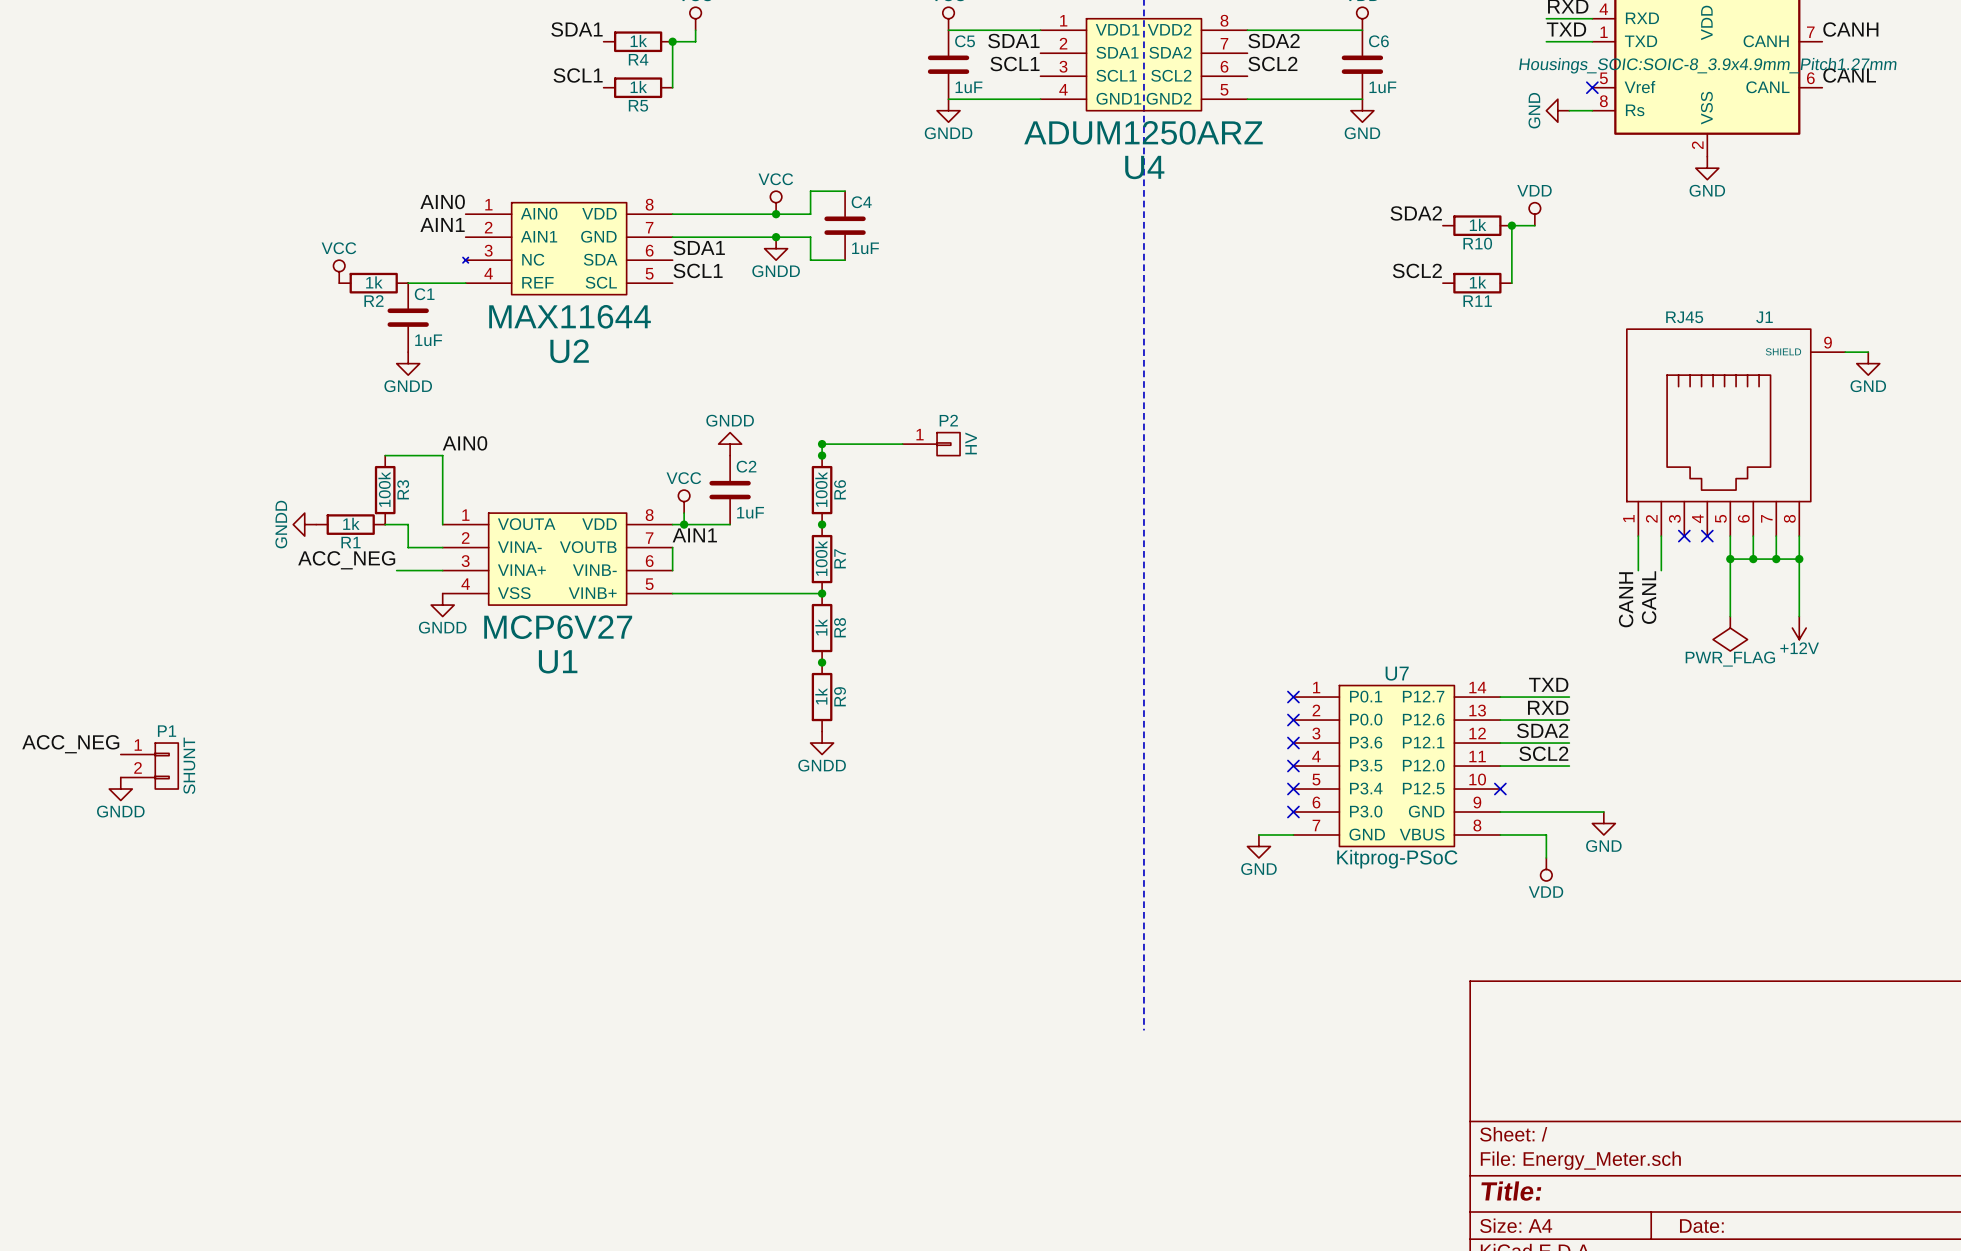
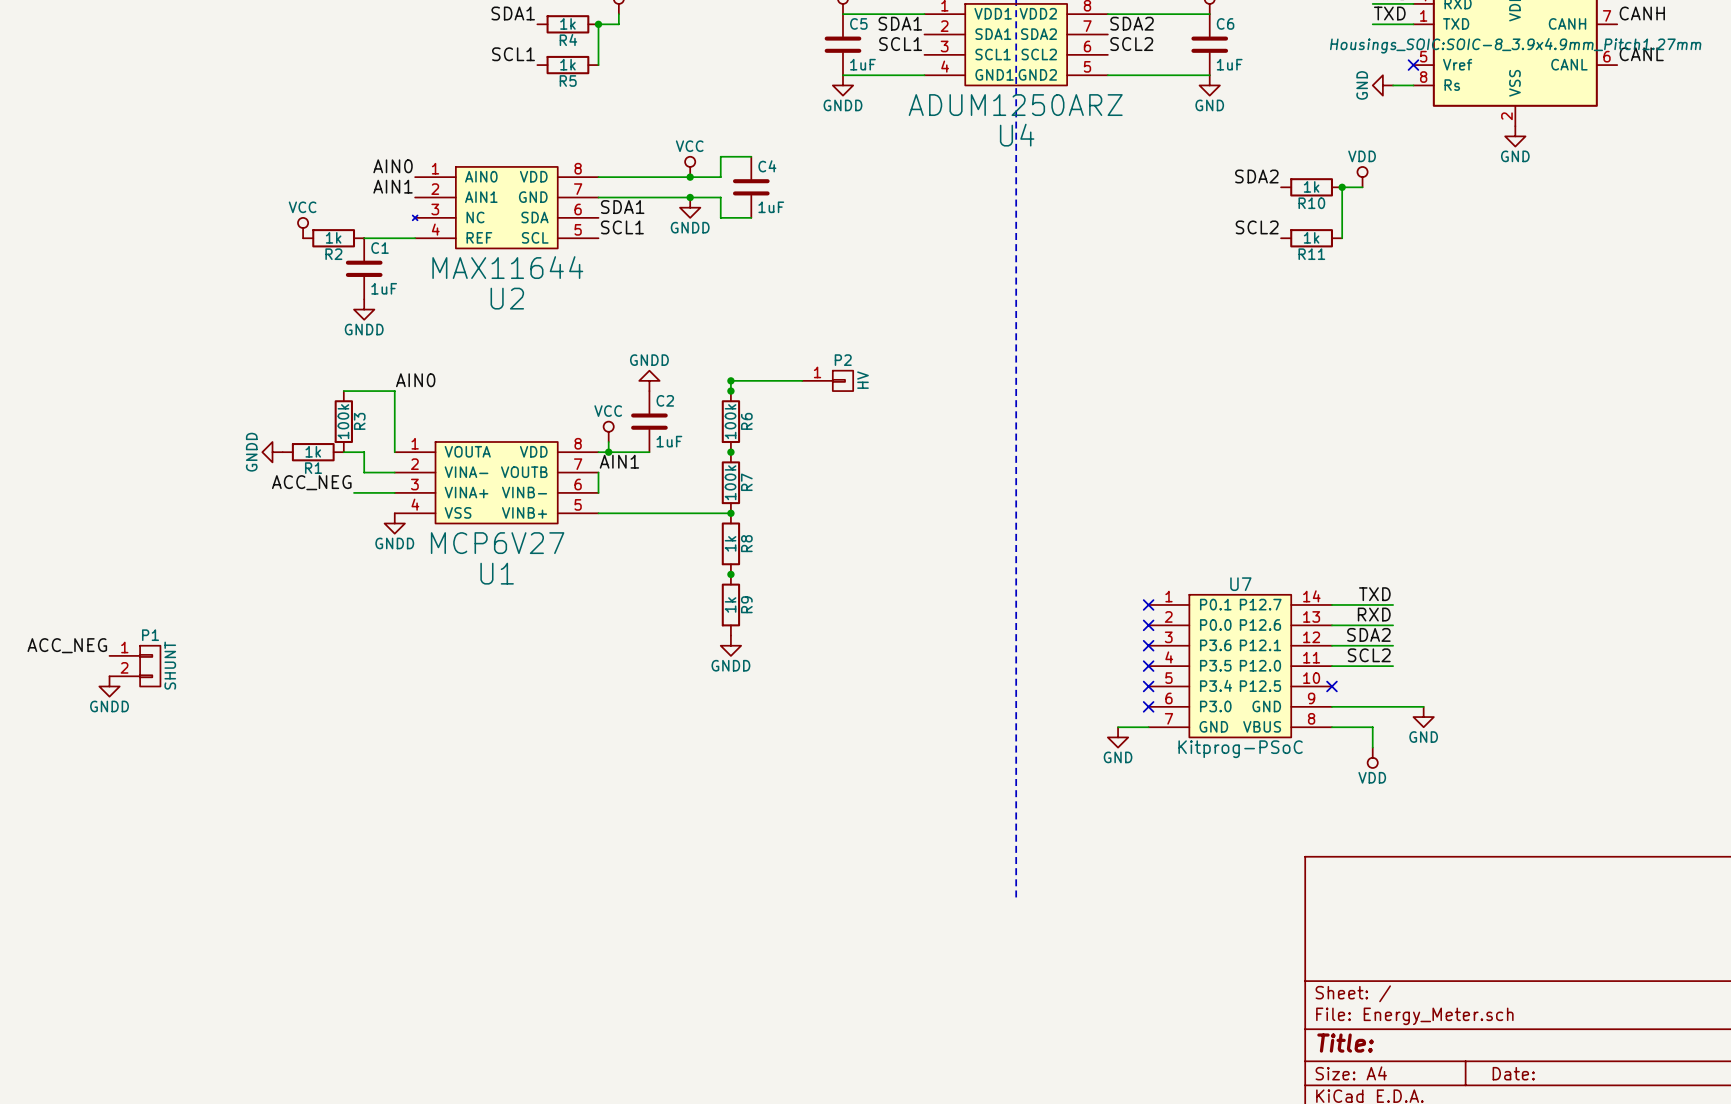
wire: (1845, 352) (1868, 352) -> none
power symbol: GND (1868, 363) -> none
J1: RJ45 (1736, 432) -> none
wire: (1638, 536) (1638, 570) -> none
wire: (1661, 536) (1661, 570) -> none
no-connect mark: (1684, 536) -> none
no-connect mark: (1707, 536) -> none
wire: (1730, 536) (1730, 616) -> none
wire: (1753, 536) (1753, 559) -> none
wire: (1776, 536) (1776, 559) -> none
wire: (1799, 536) (1799, 616) -> none
wire: (1730, 559) (1799, 559) -> none
junction: (1730, 559) -> none
junction: (1753, 559) -> none
junction: (1776, 559) -> none
junction: (1799, 559) -> none
label: CANL (1649, 597) -> none
label: CANH (1626, 599) -> none
power symbol: +12V (1799, 628) -> none
power symbol: PWR_FLAG (1730, 633) -> none

